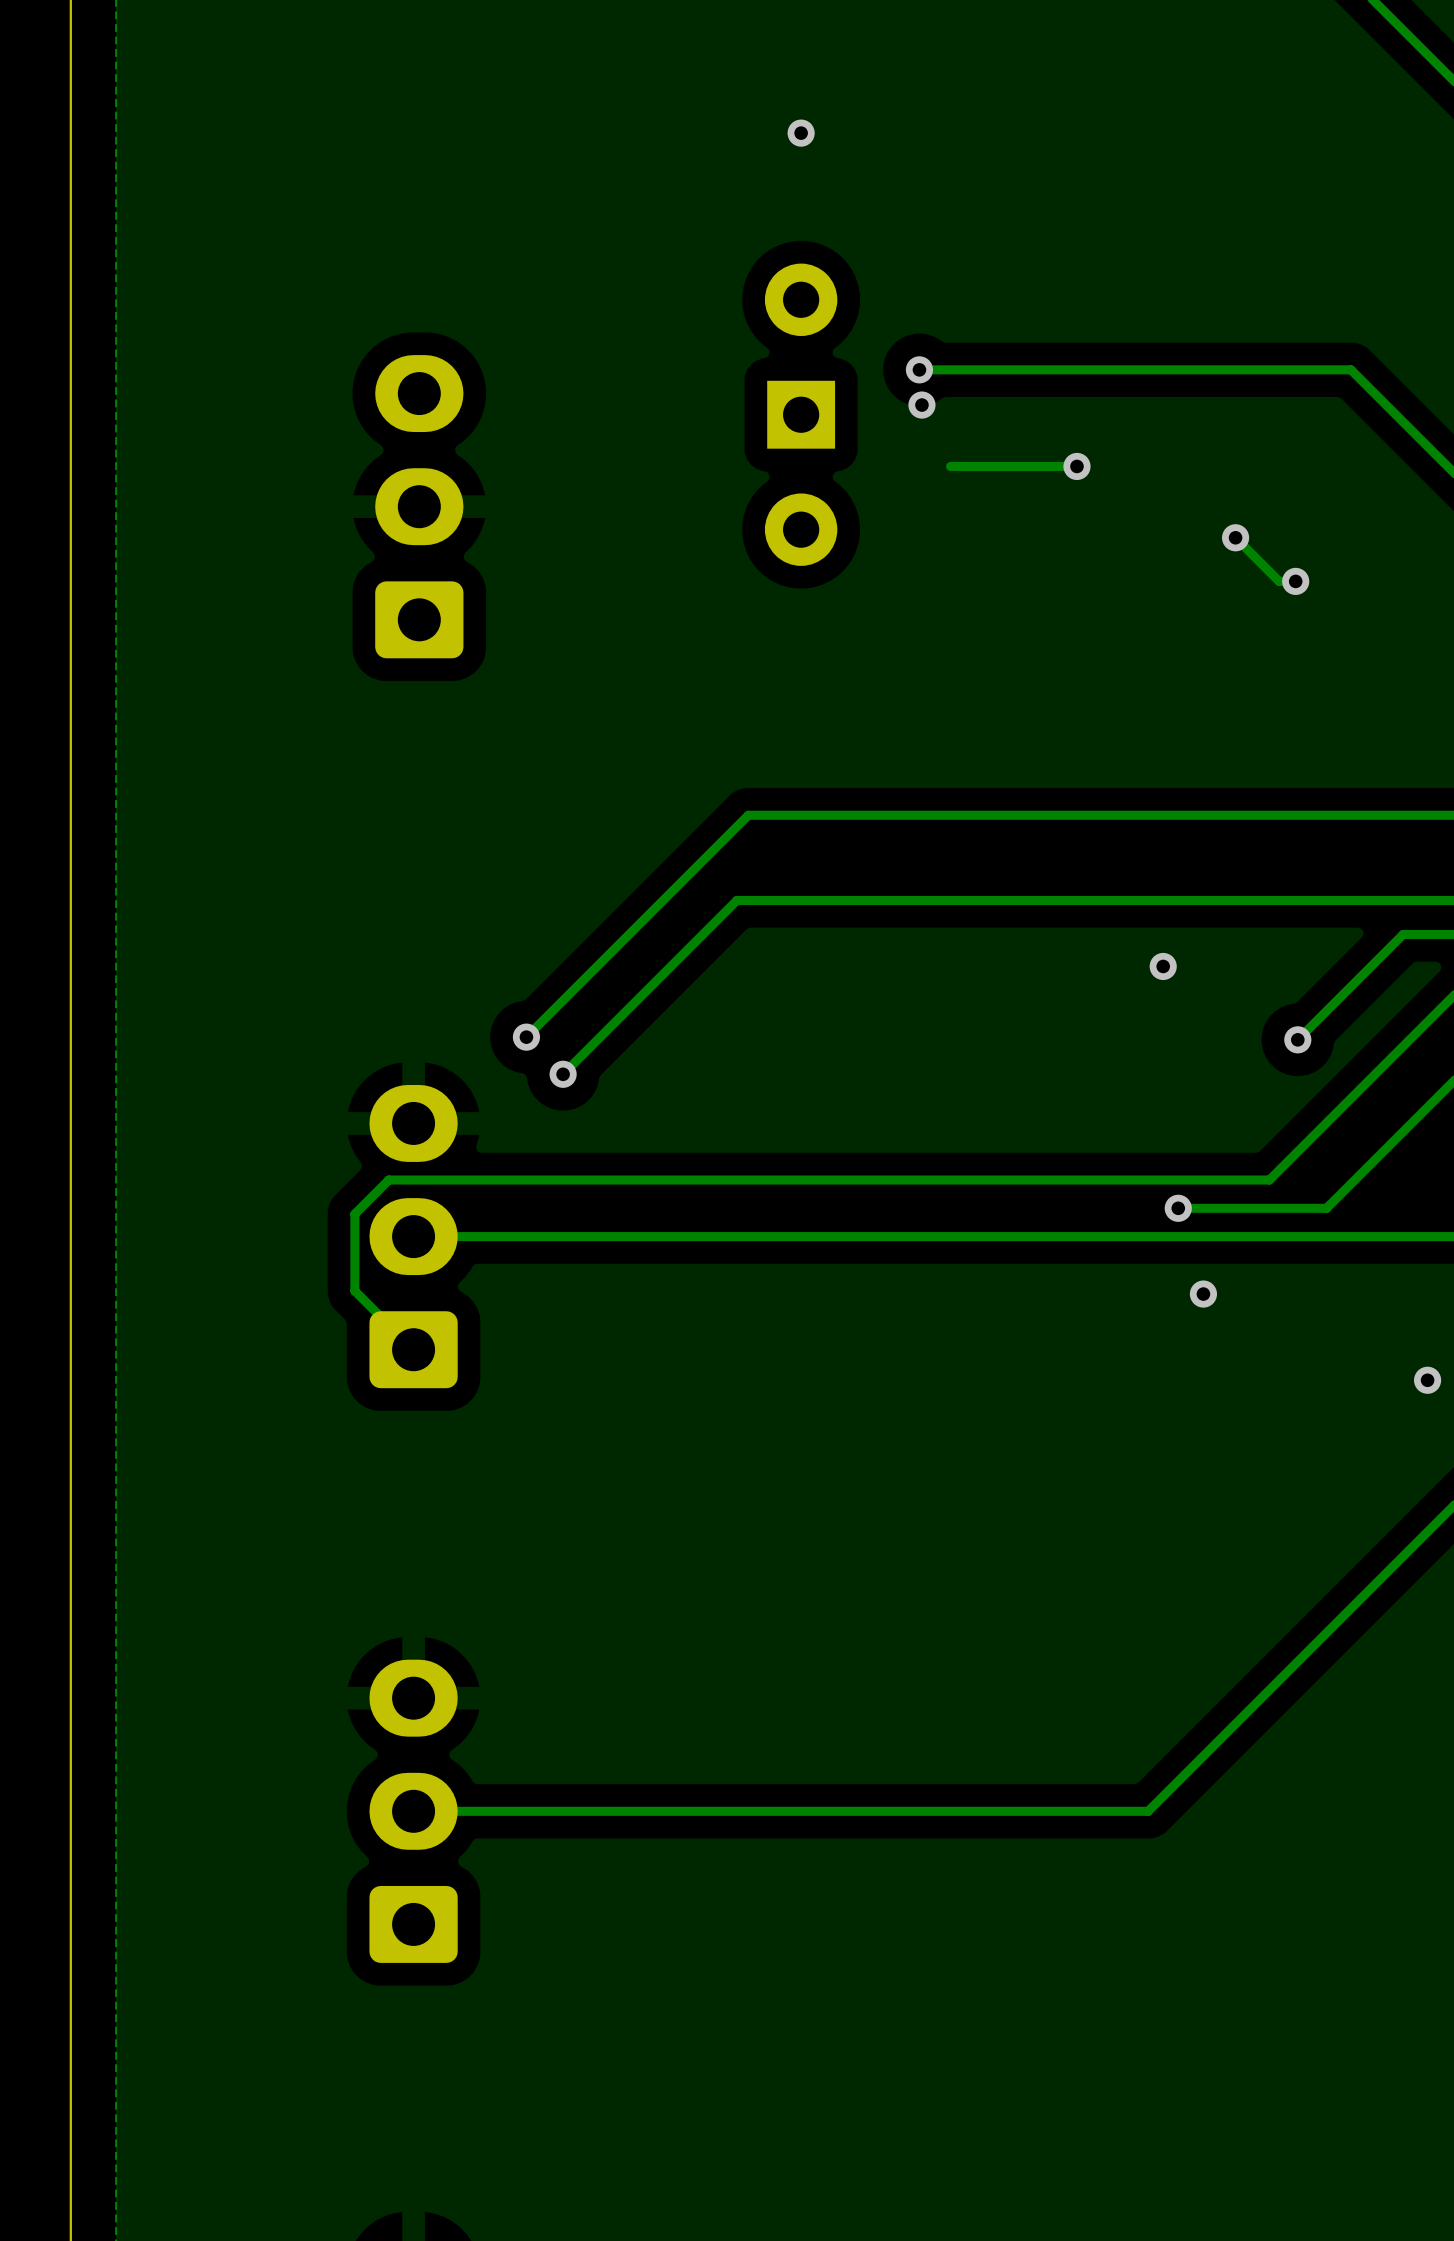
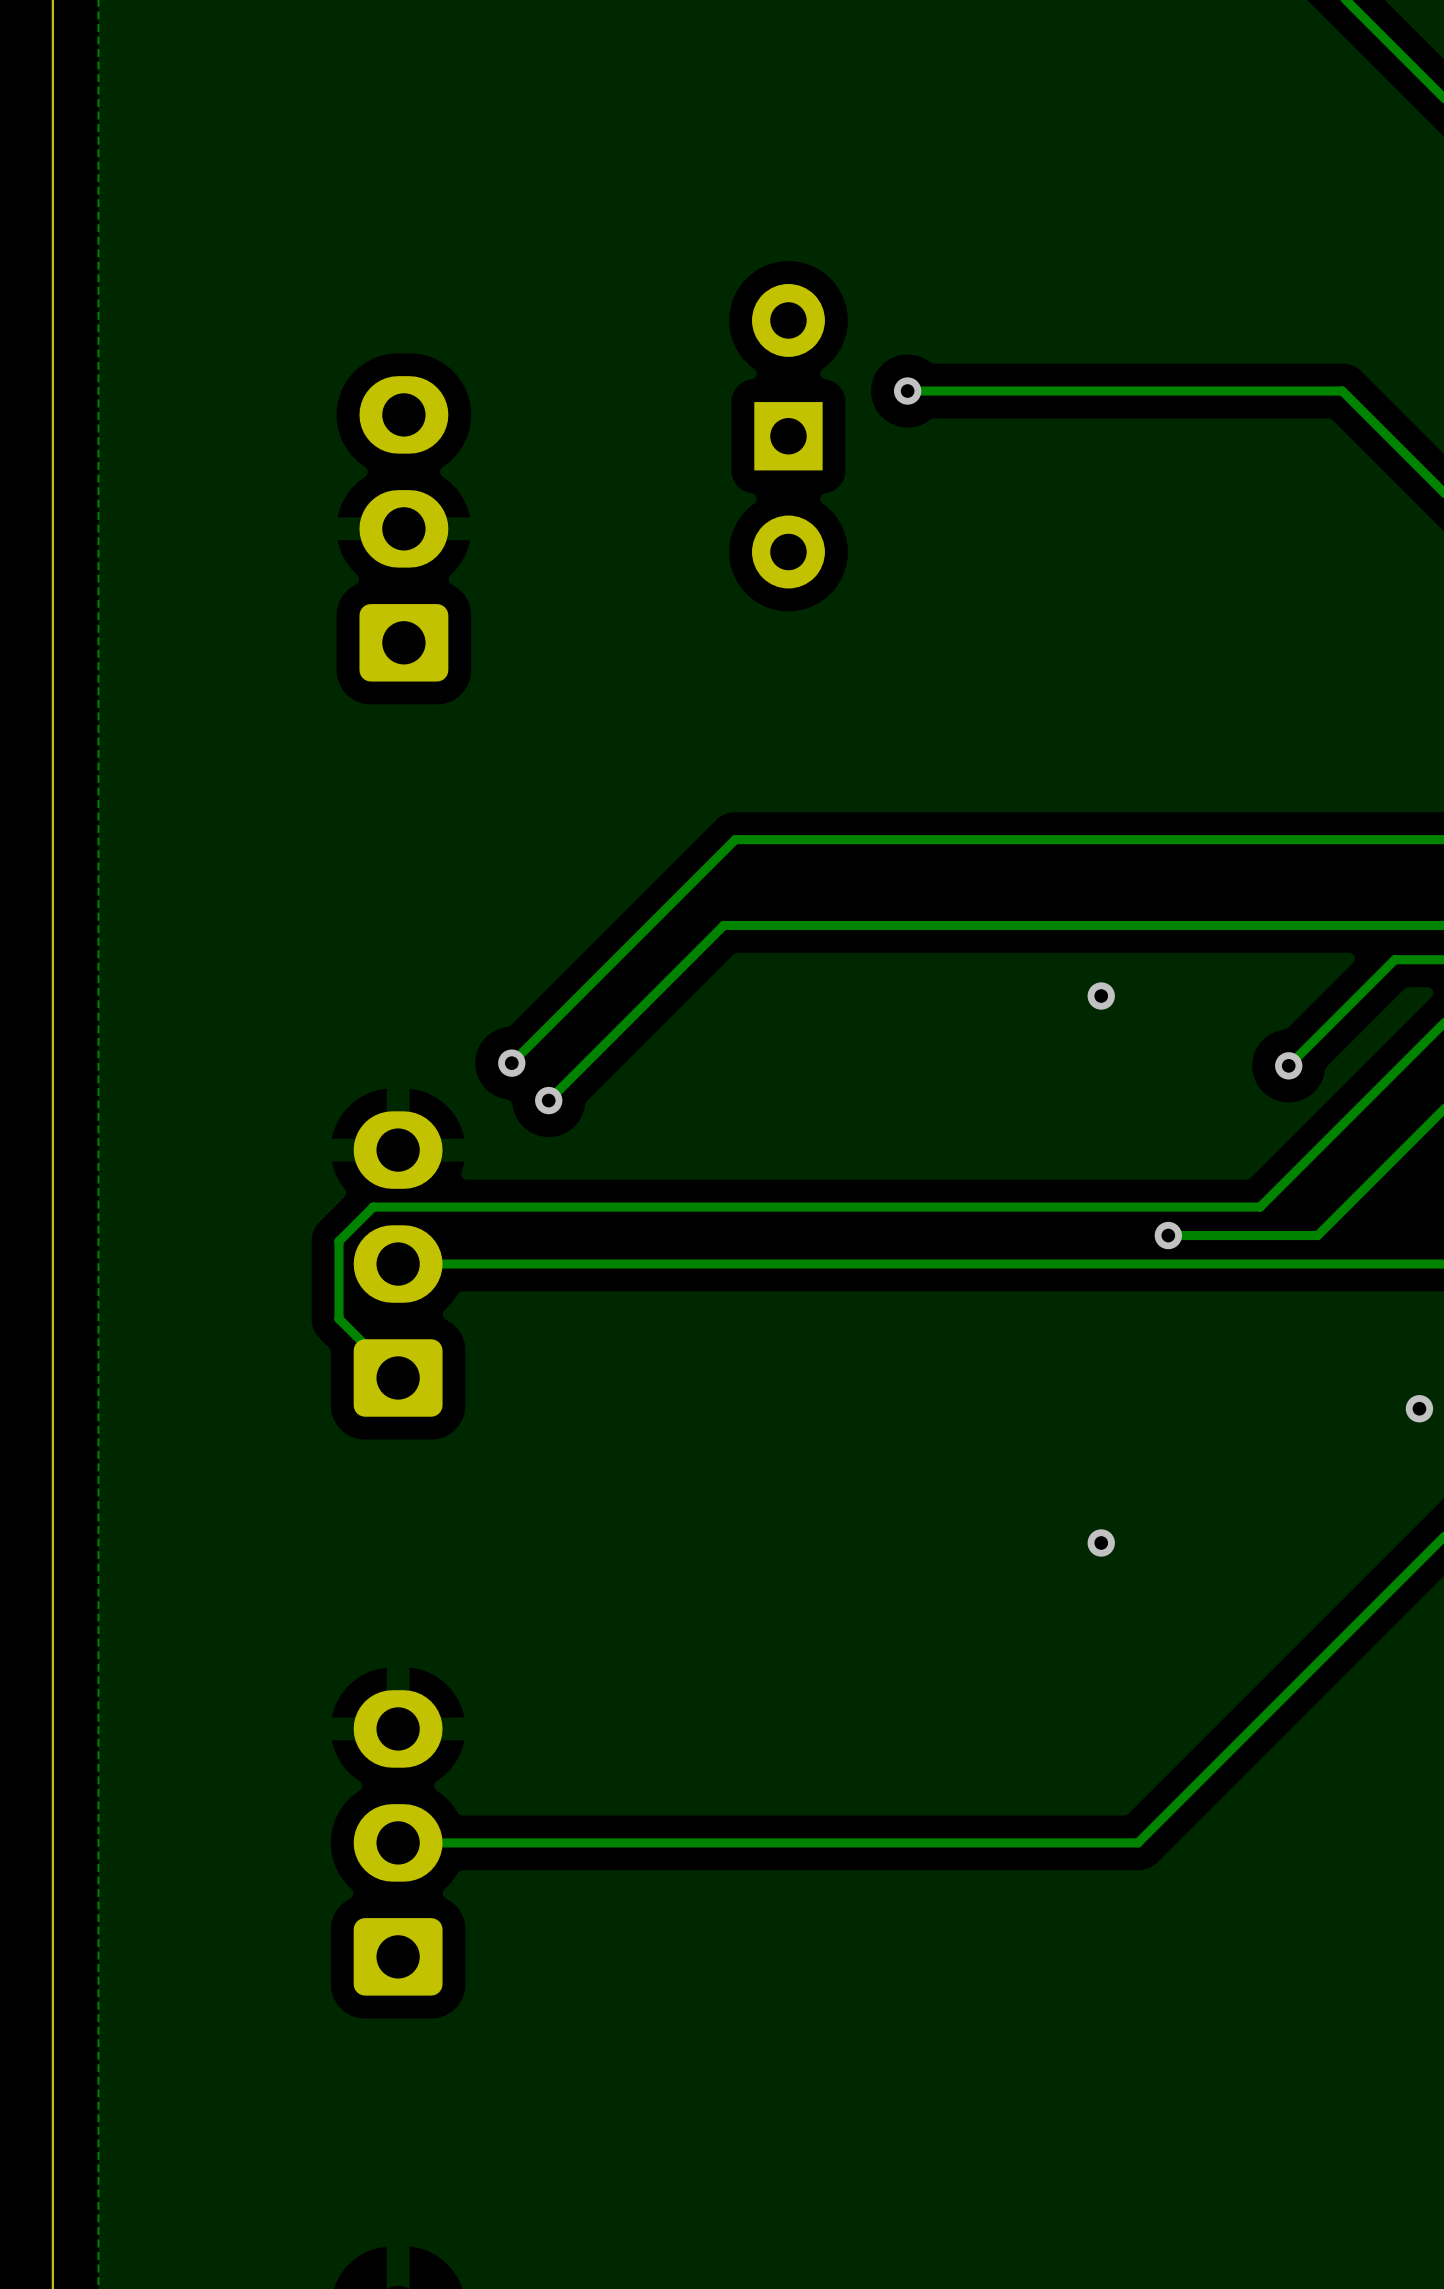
via: (801, 133) -> none
via: (921, 405) -> none
track: (1077, 466) (950, 466) -> none
via: (1077, 466) -> none
track: (1235, 537) (1279, 581) (1295, 581) -> none
via: (1235, 537) -> none
via: (1295, 581) -> none
via position: (1163, 966) -> (1101, 996)
via: (1203, 1294) -> none
via: none -> (1101, 1542)

